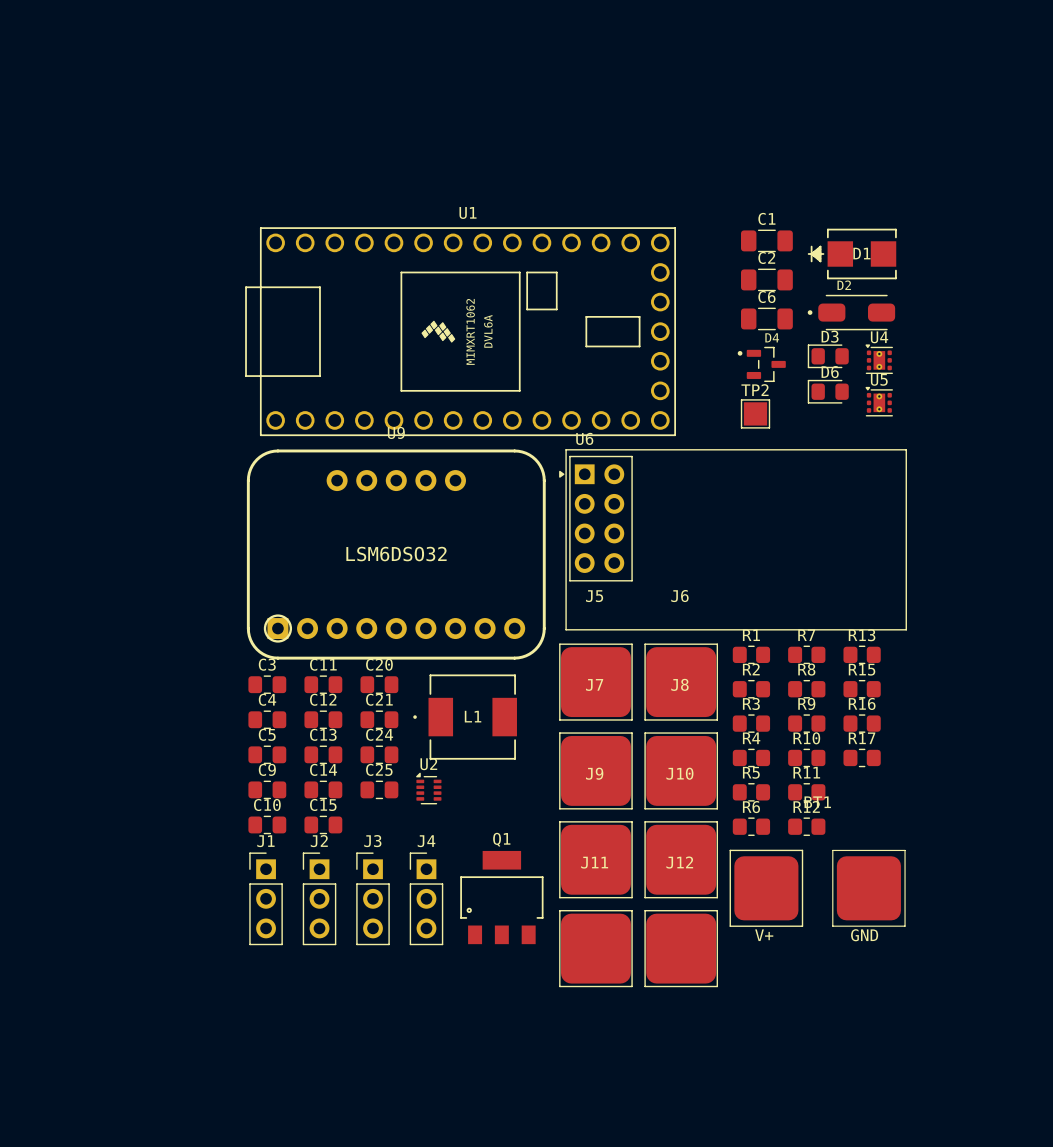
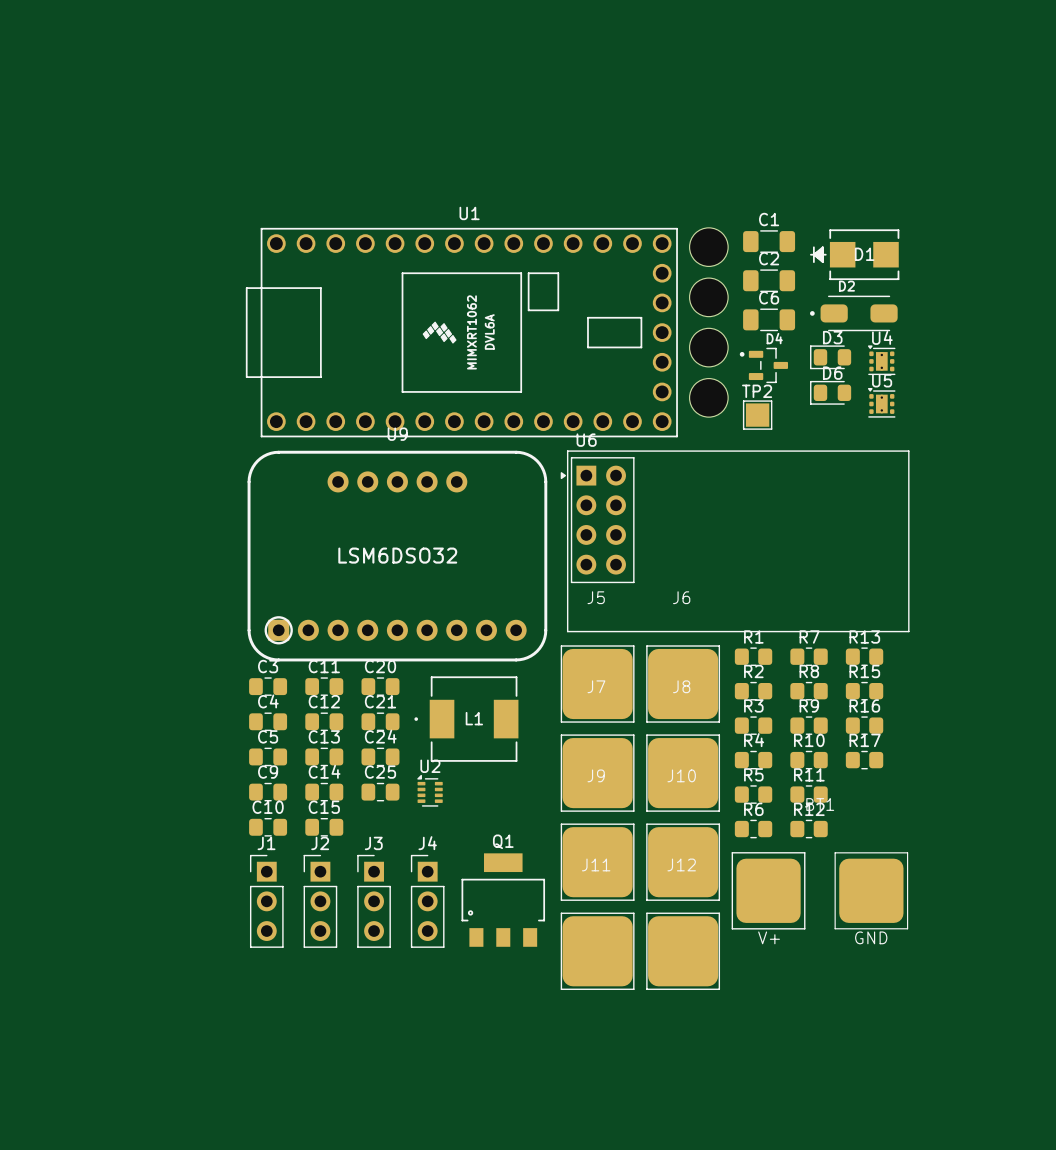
part: none -> (708, 247)
part: none -> (708, 297)
part: none -> (708, 347)
part: none -> (708, 397)

